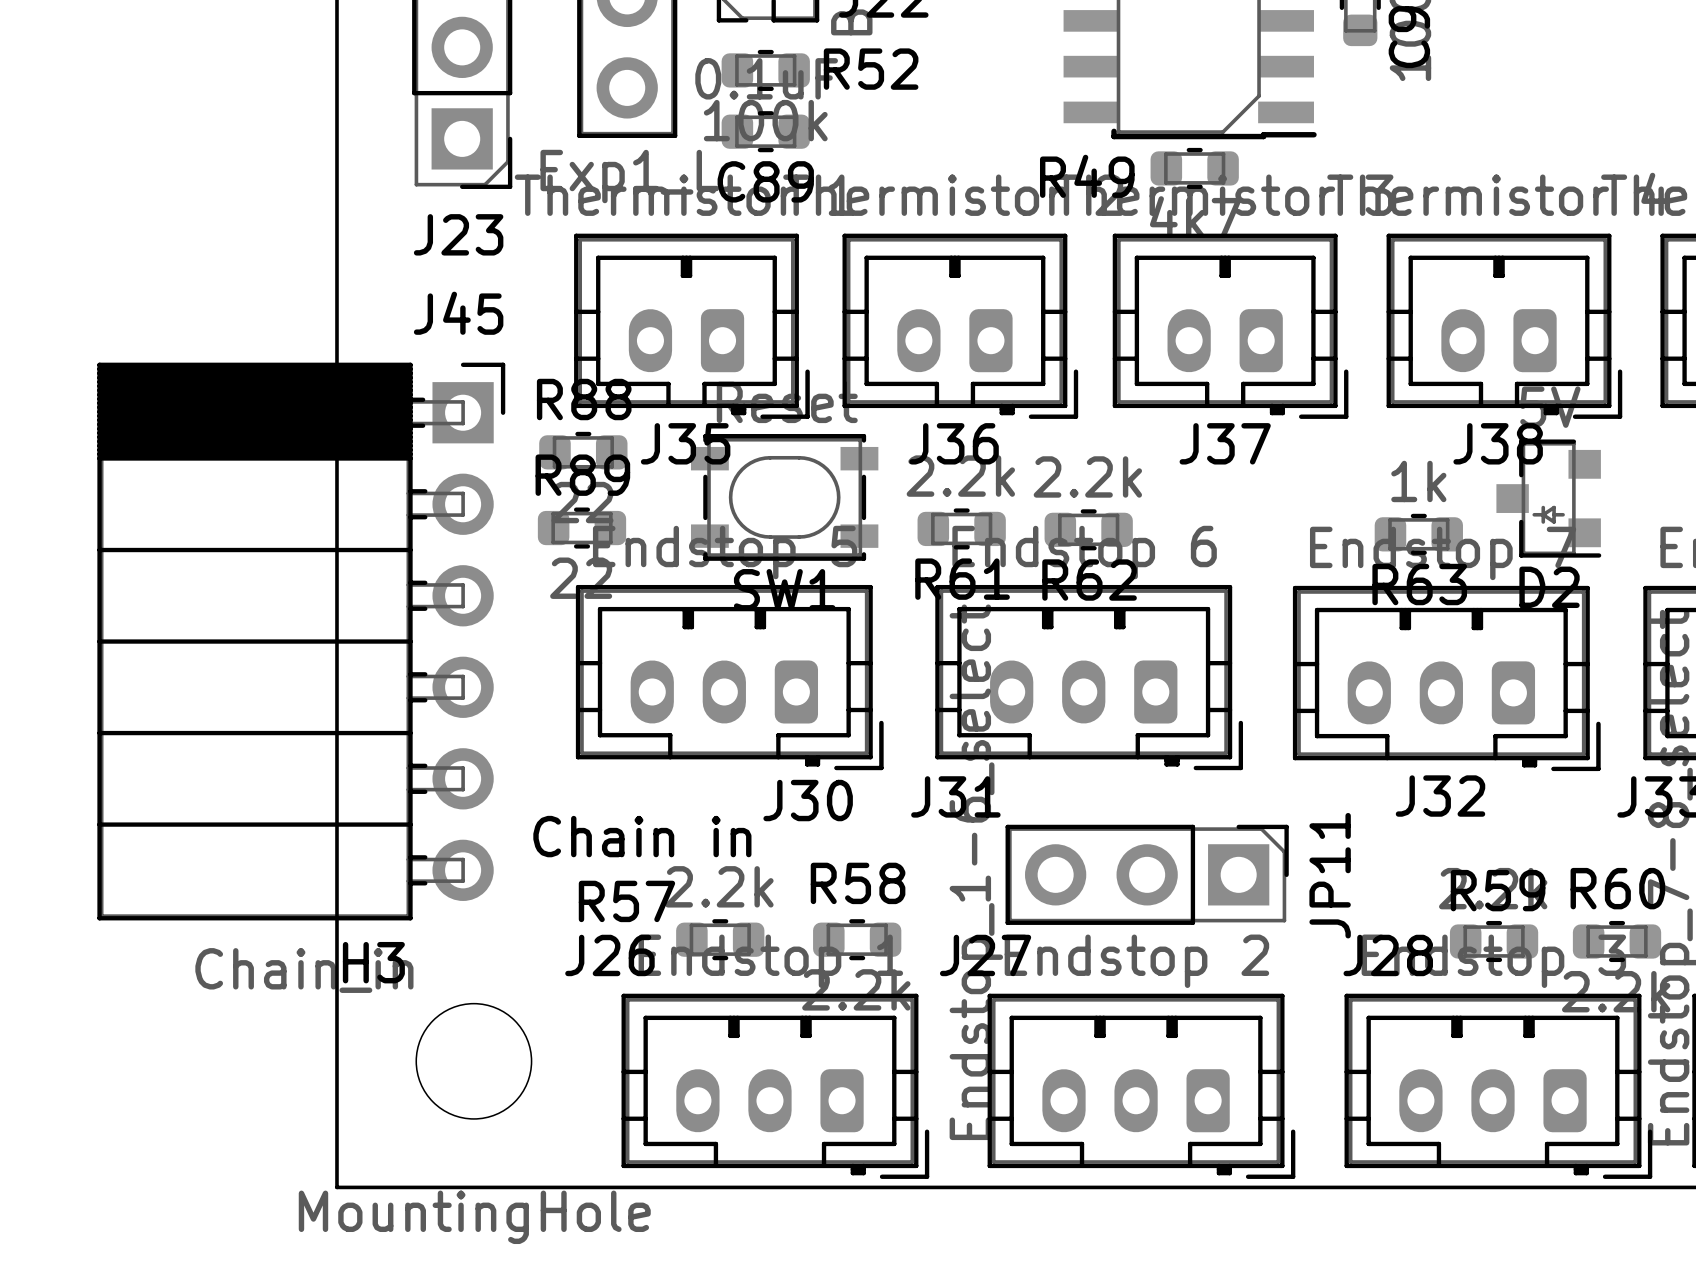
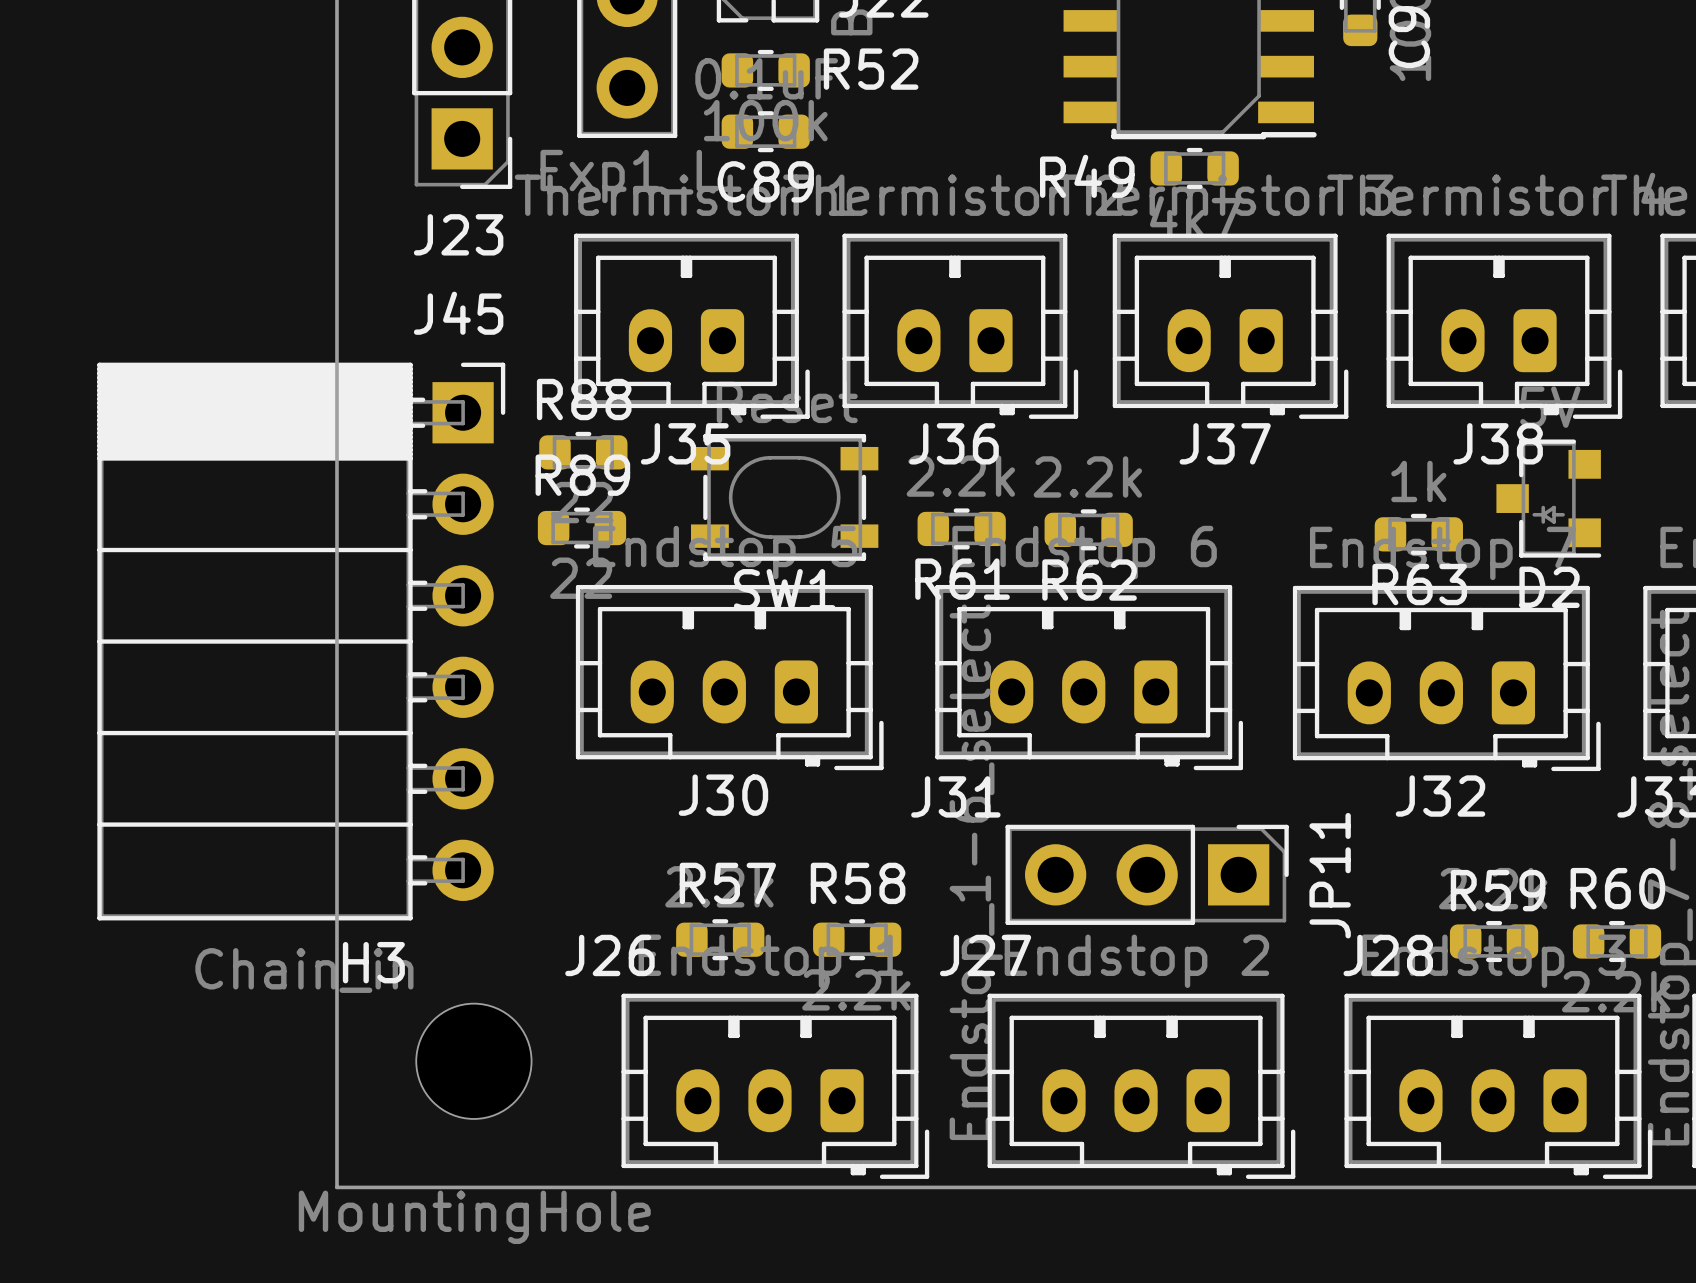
J30 name position: J30 (808, 800) -> J30 (723, 795)
text: Chain in (642, 836) -> none
R57 name position: R57 (626, 901) -> R57 (727, 883)

